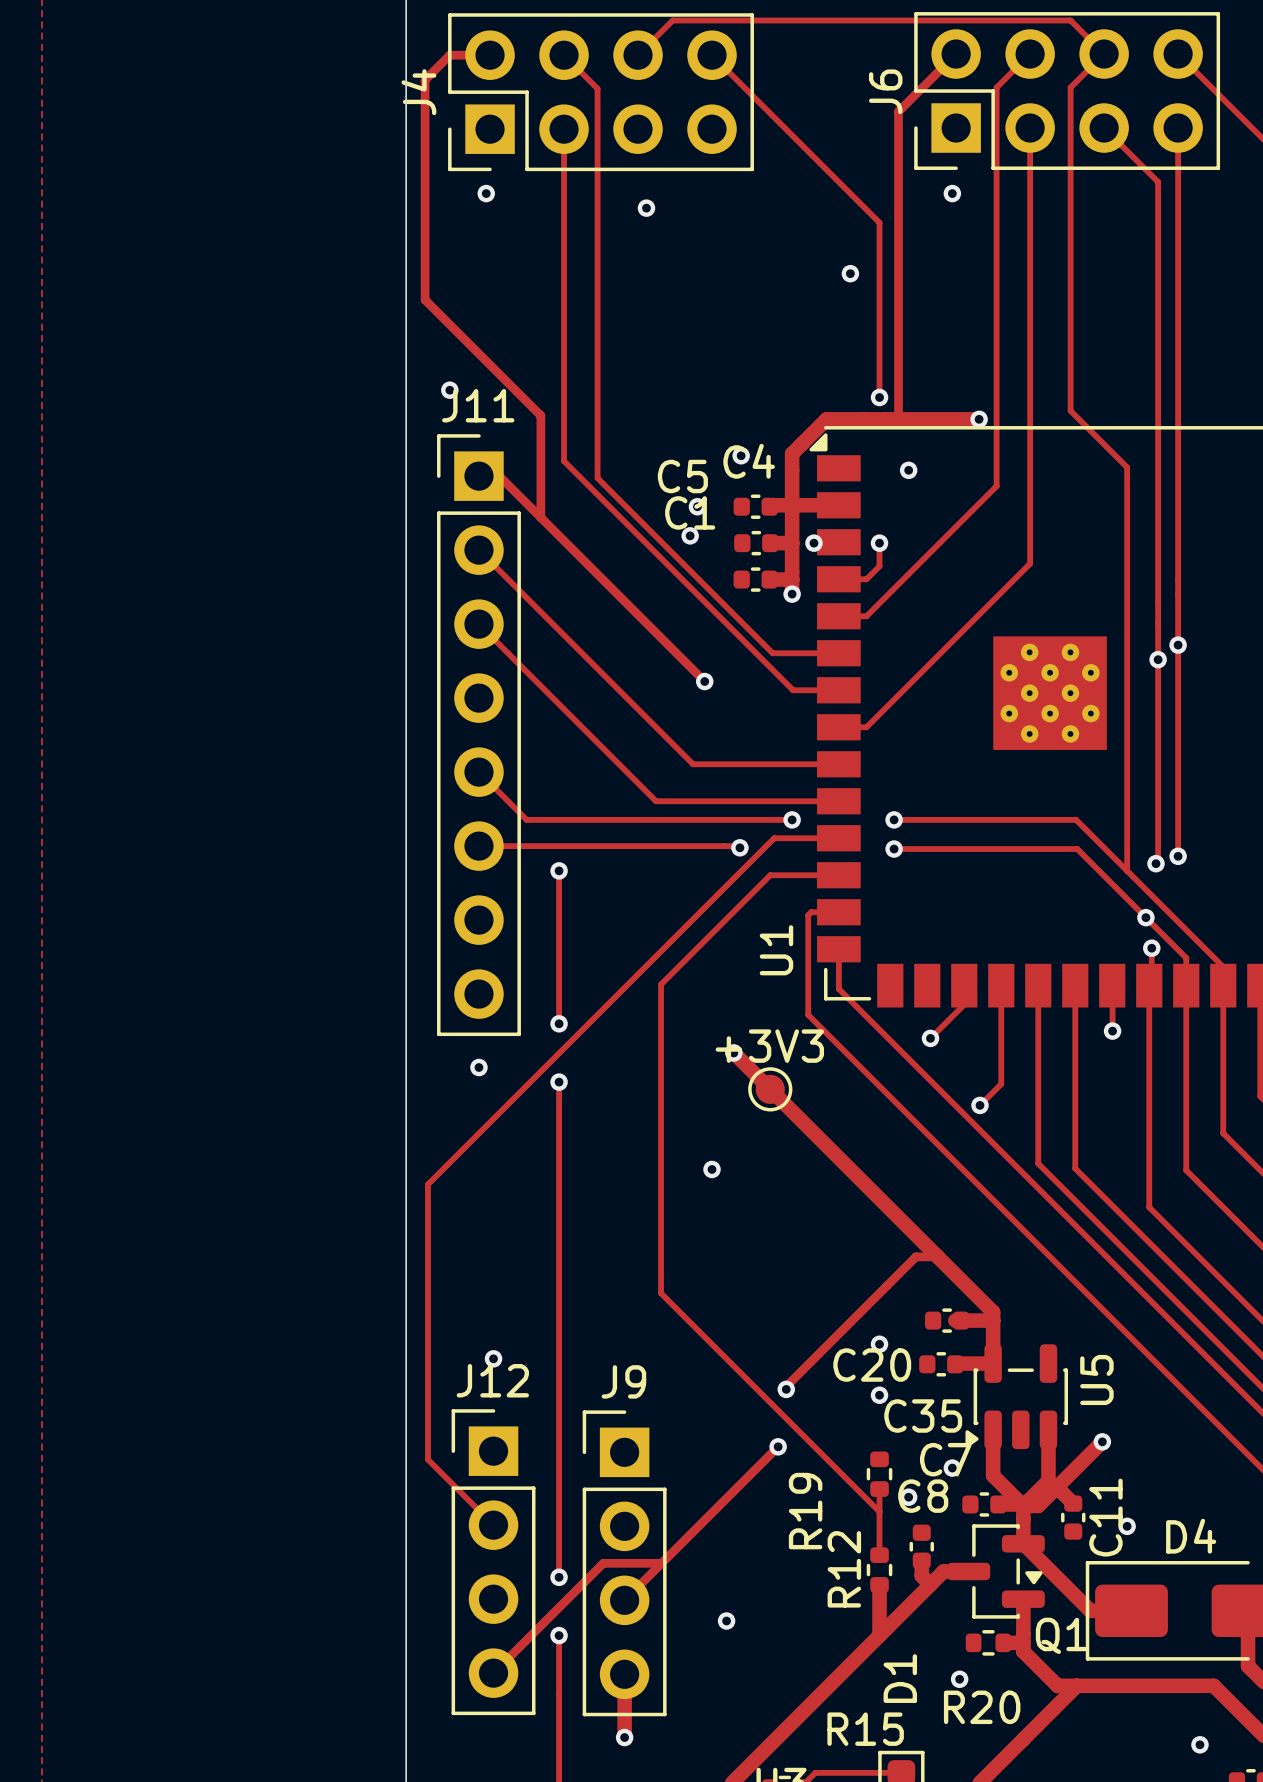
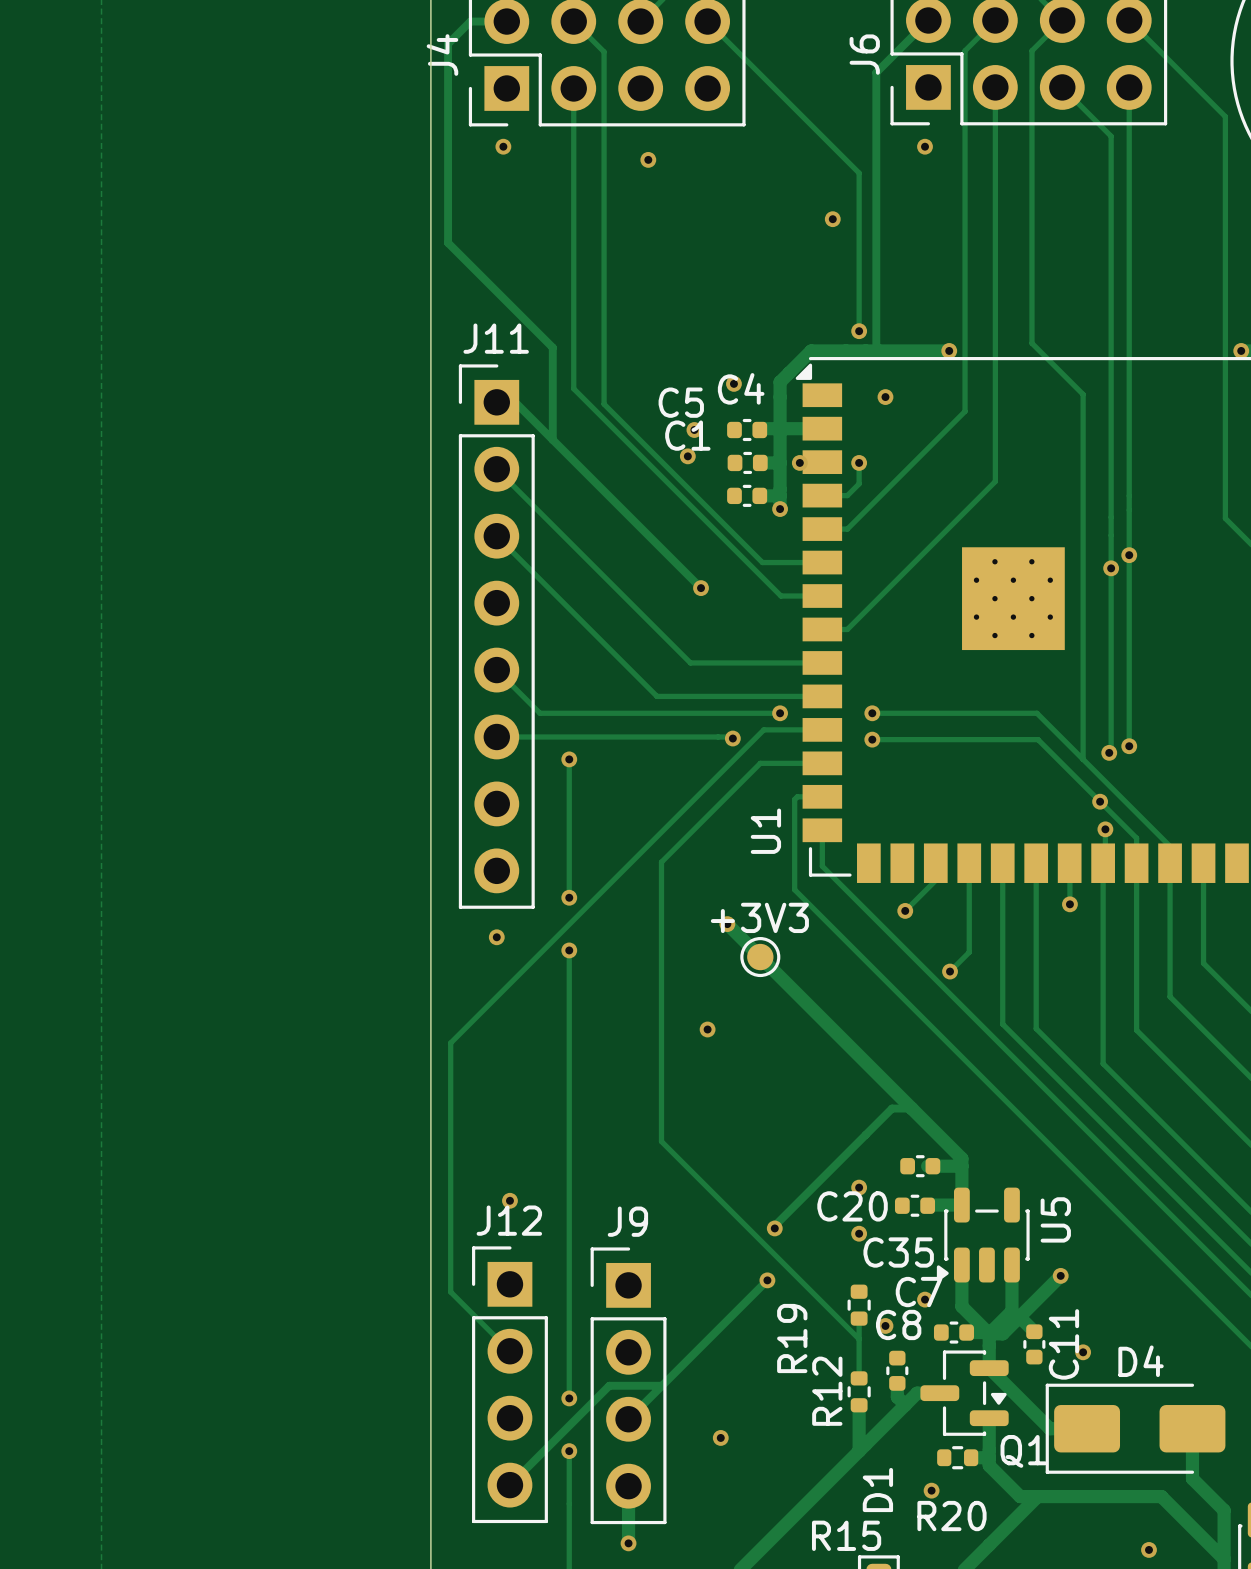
via: (449, 390) -> none

